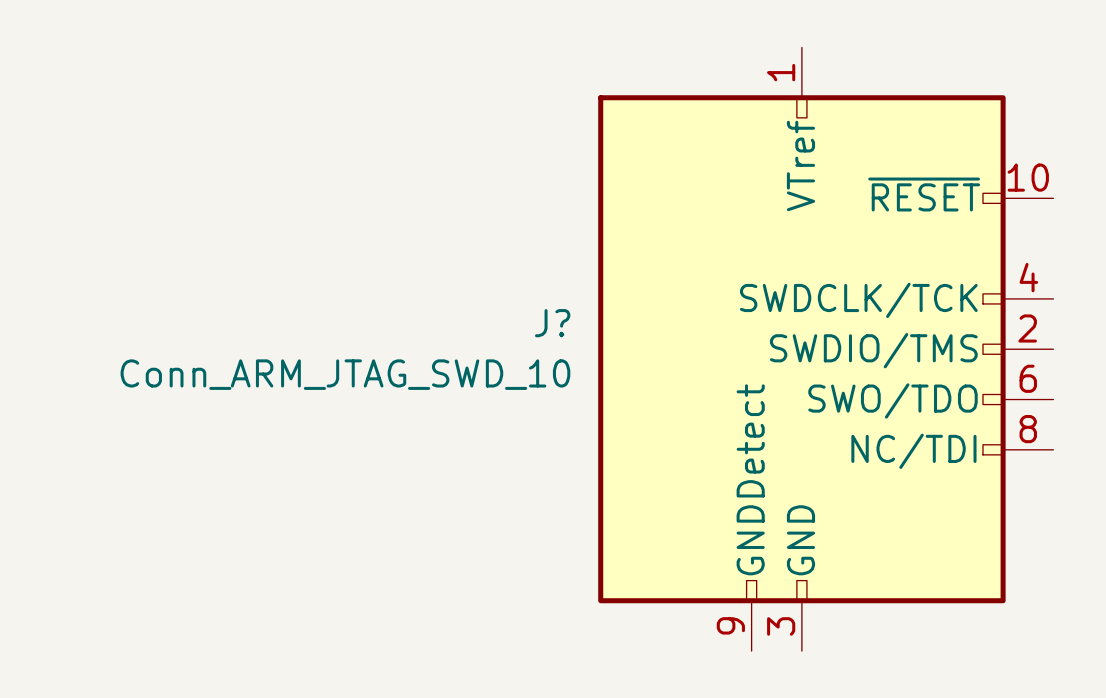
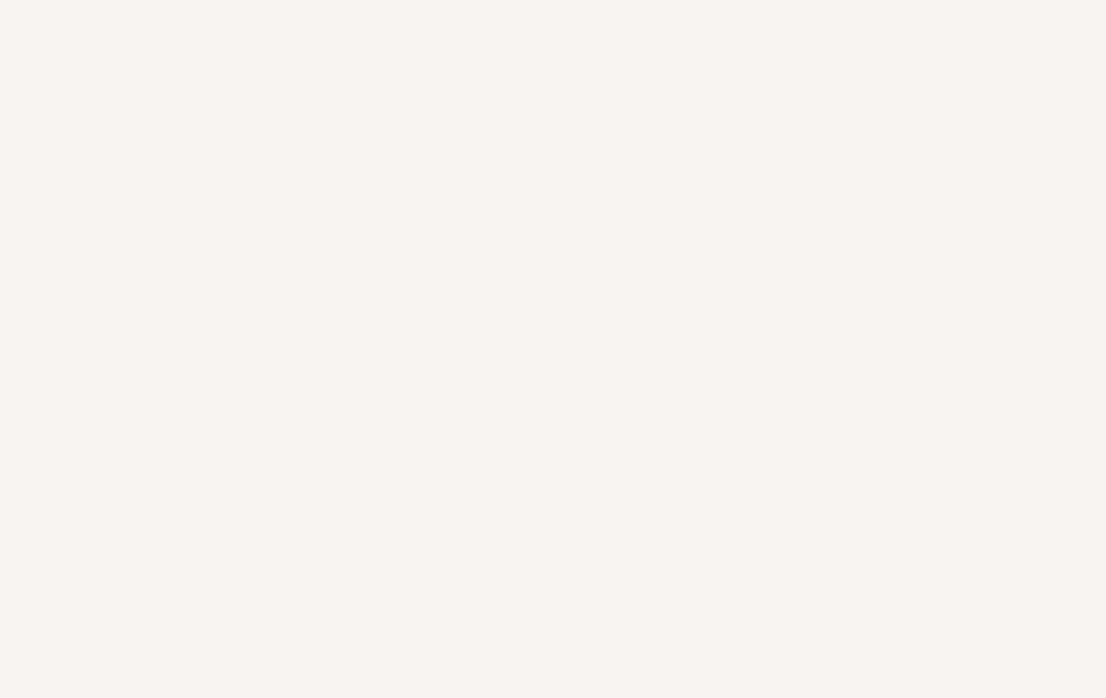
J?: Conn_ARM_JTAG_SWD_10 (825, 349) -> none

